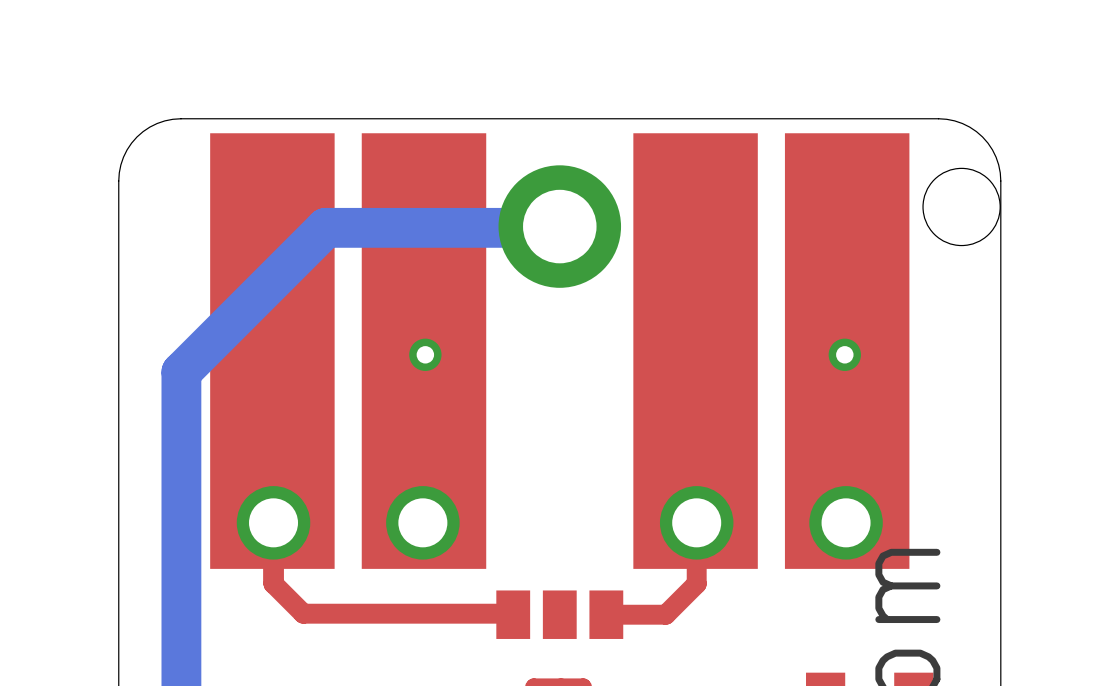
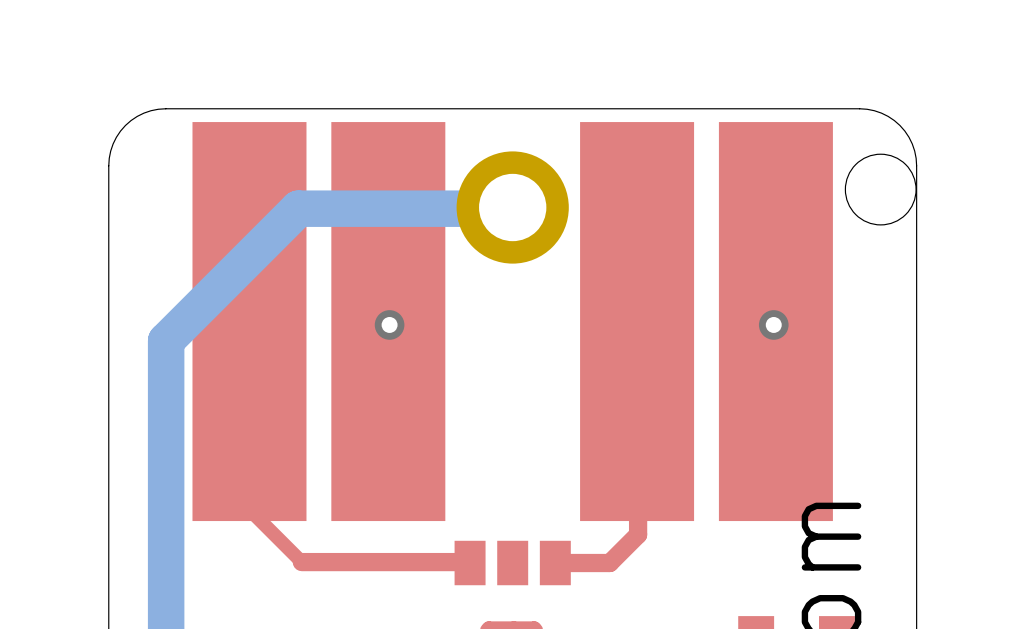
top track: (272, 502) (273, 583) (303, 613) (329, 613) -> (249, 509) (301, 562)
via: (273, 522) -> none
via: (422, 522) -> none
via: (696, 522) -> none
via: (846, 522) -> none

